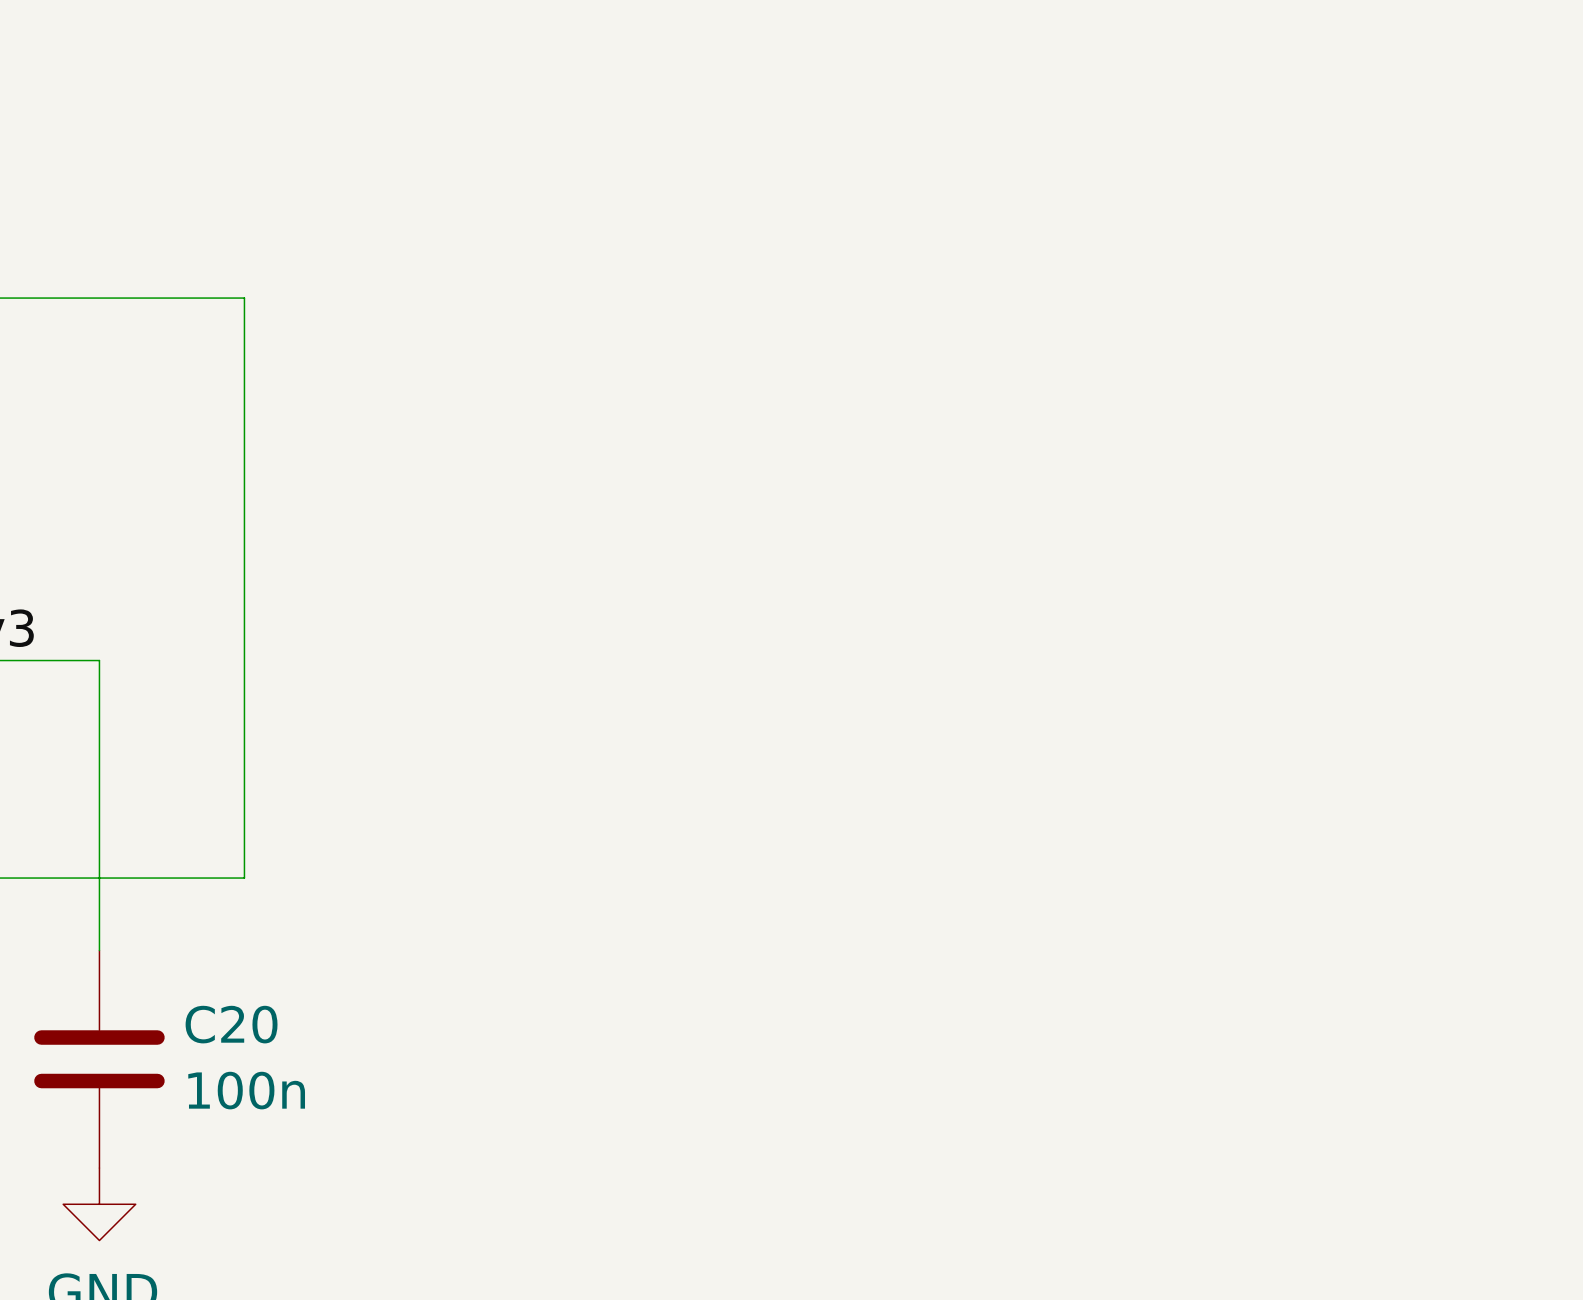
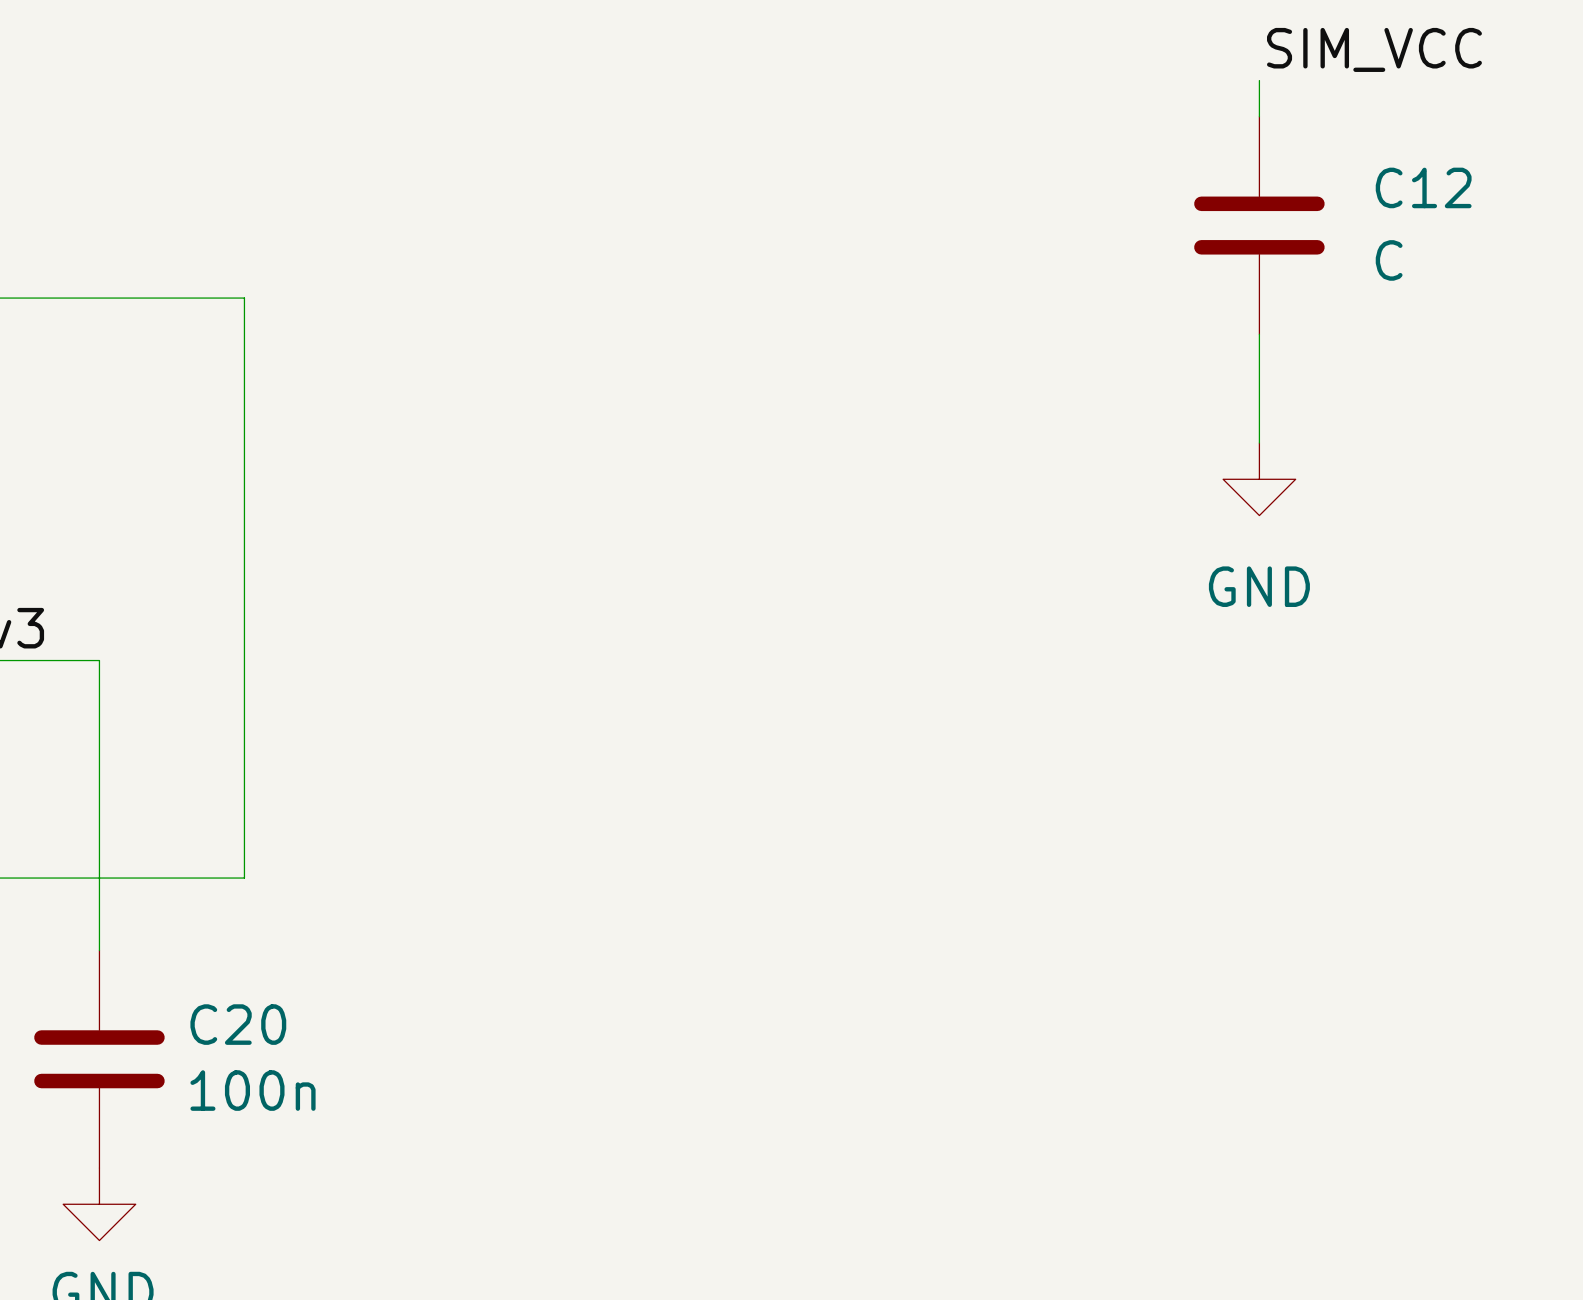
label: none -> SIM_VCC (1374, 49)
wire: none -> (1259, 80) (1259, 116)
C12: none -> C (1259, 225)
wire: none -> (1259, 334) (1259, 443)
power symbol: none -> GND (1259, 479)

